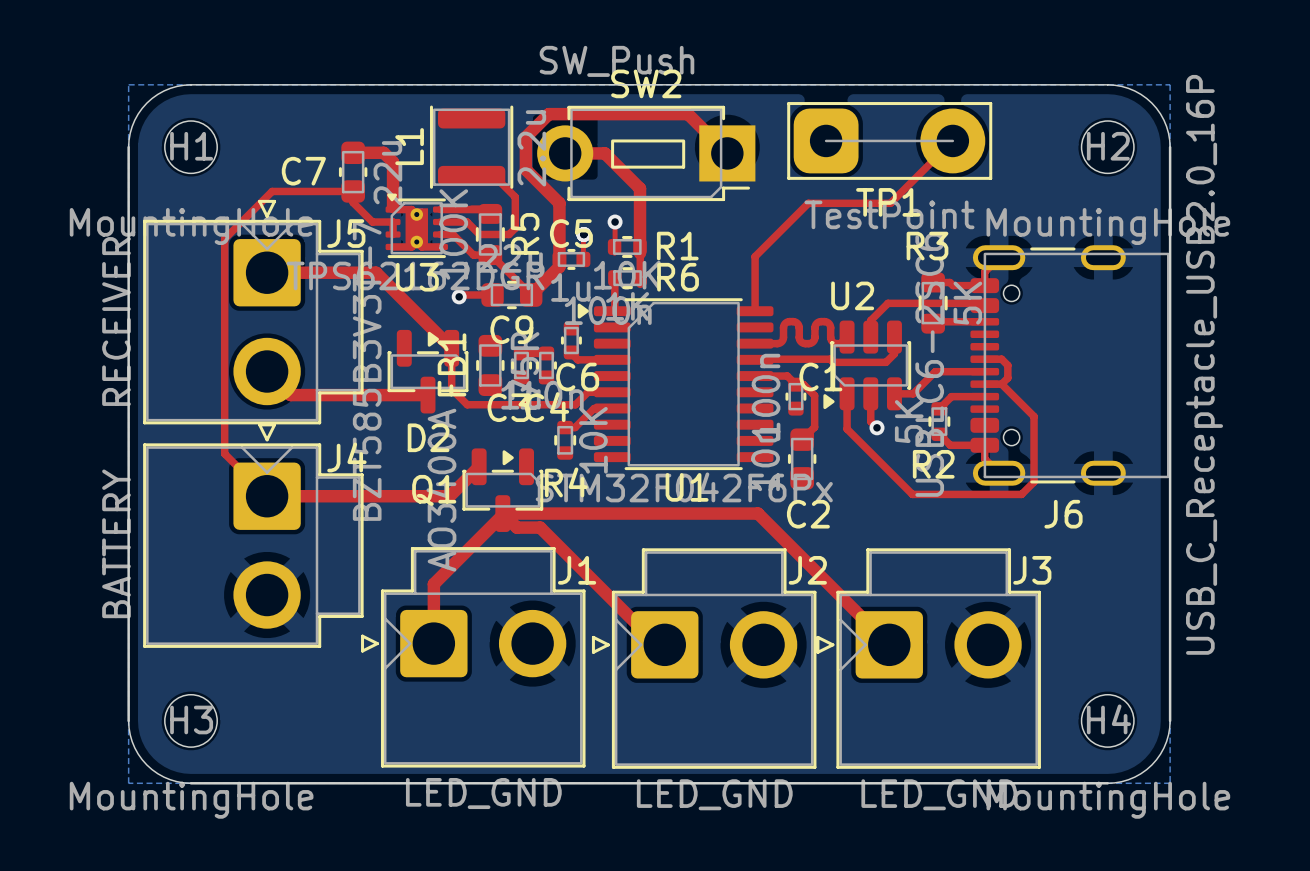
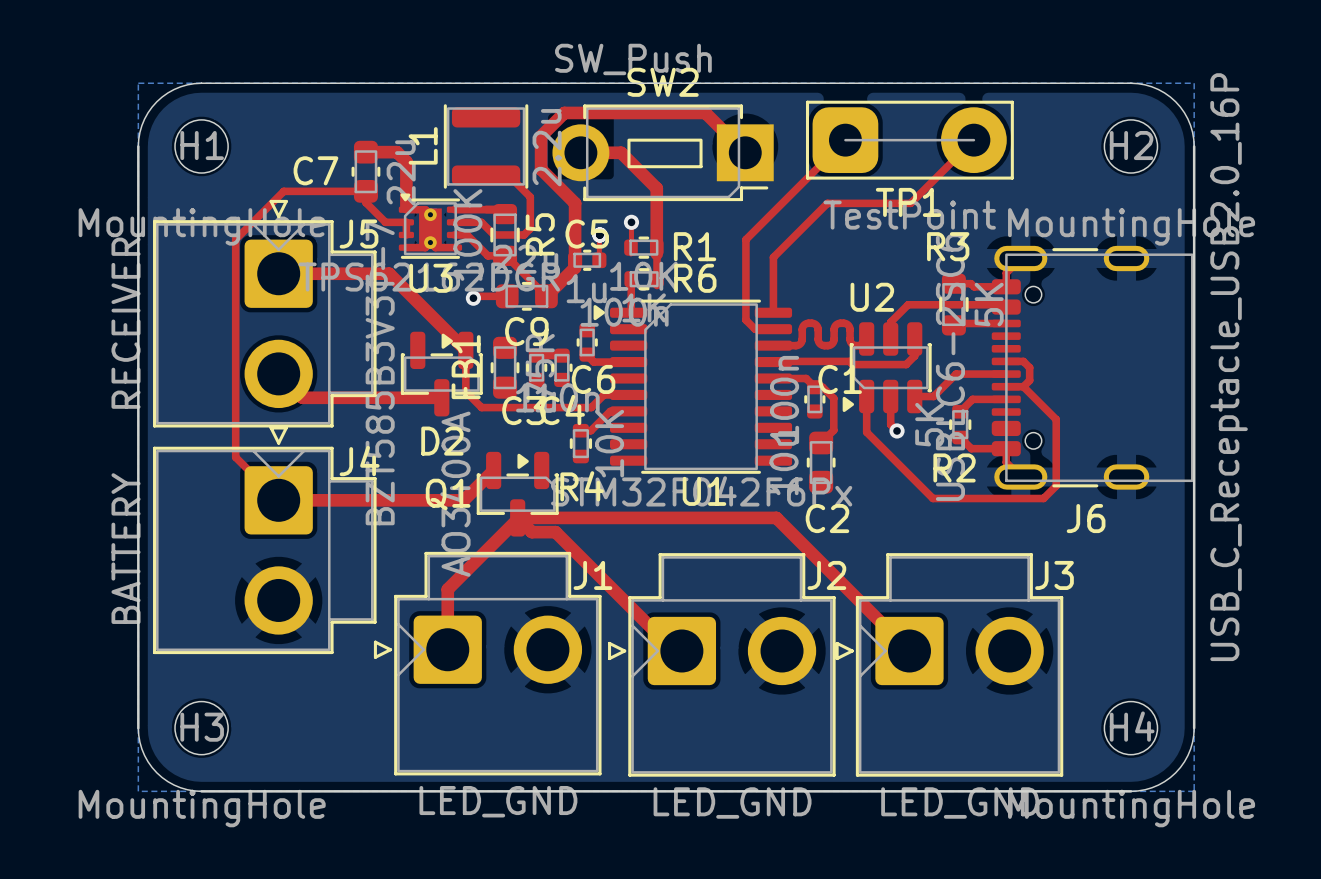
top track: none -> (845, 140) (745, 239) (745, 320) (755, 329) (773, 329)

